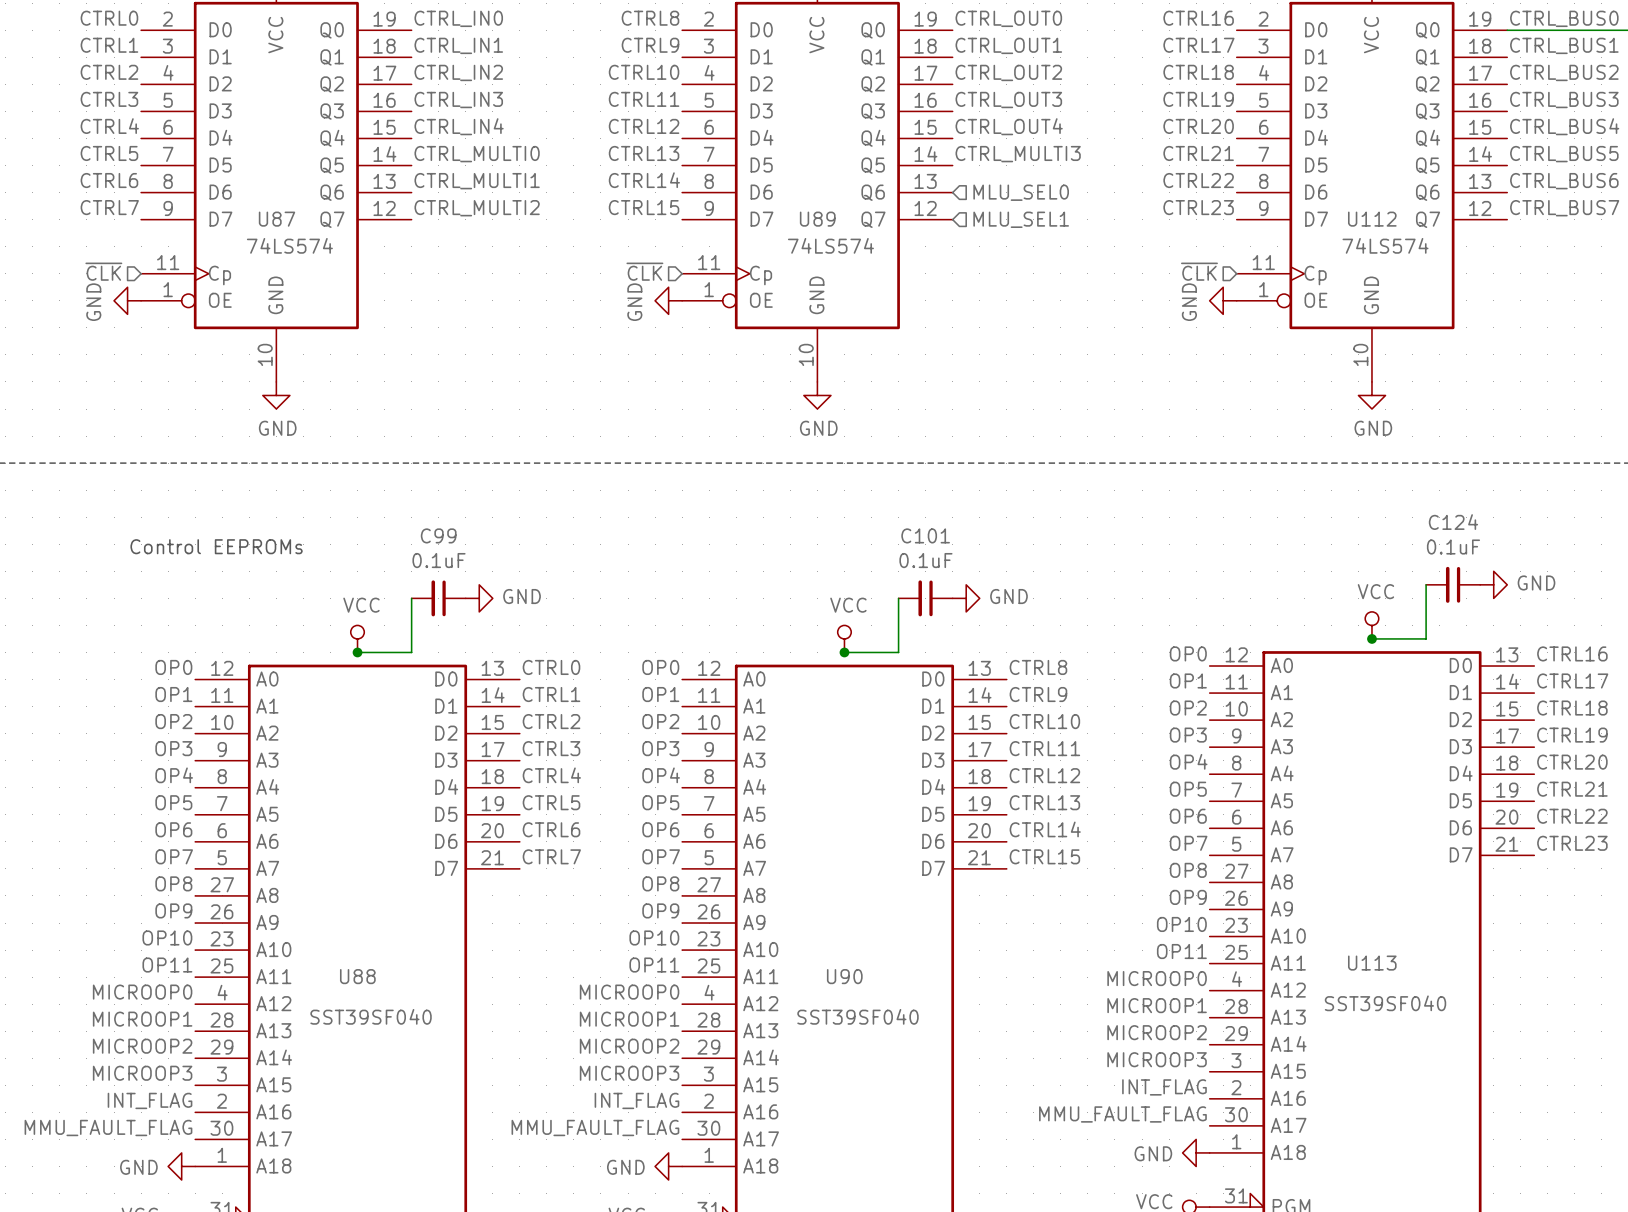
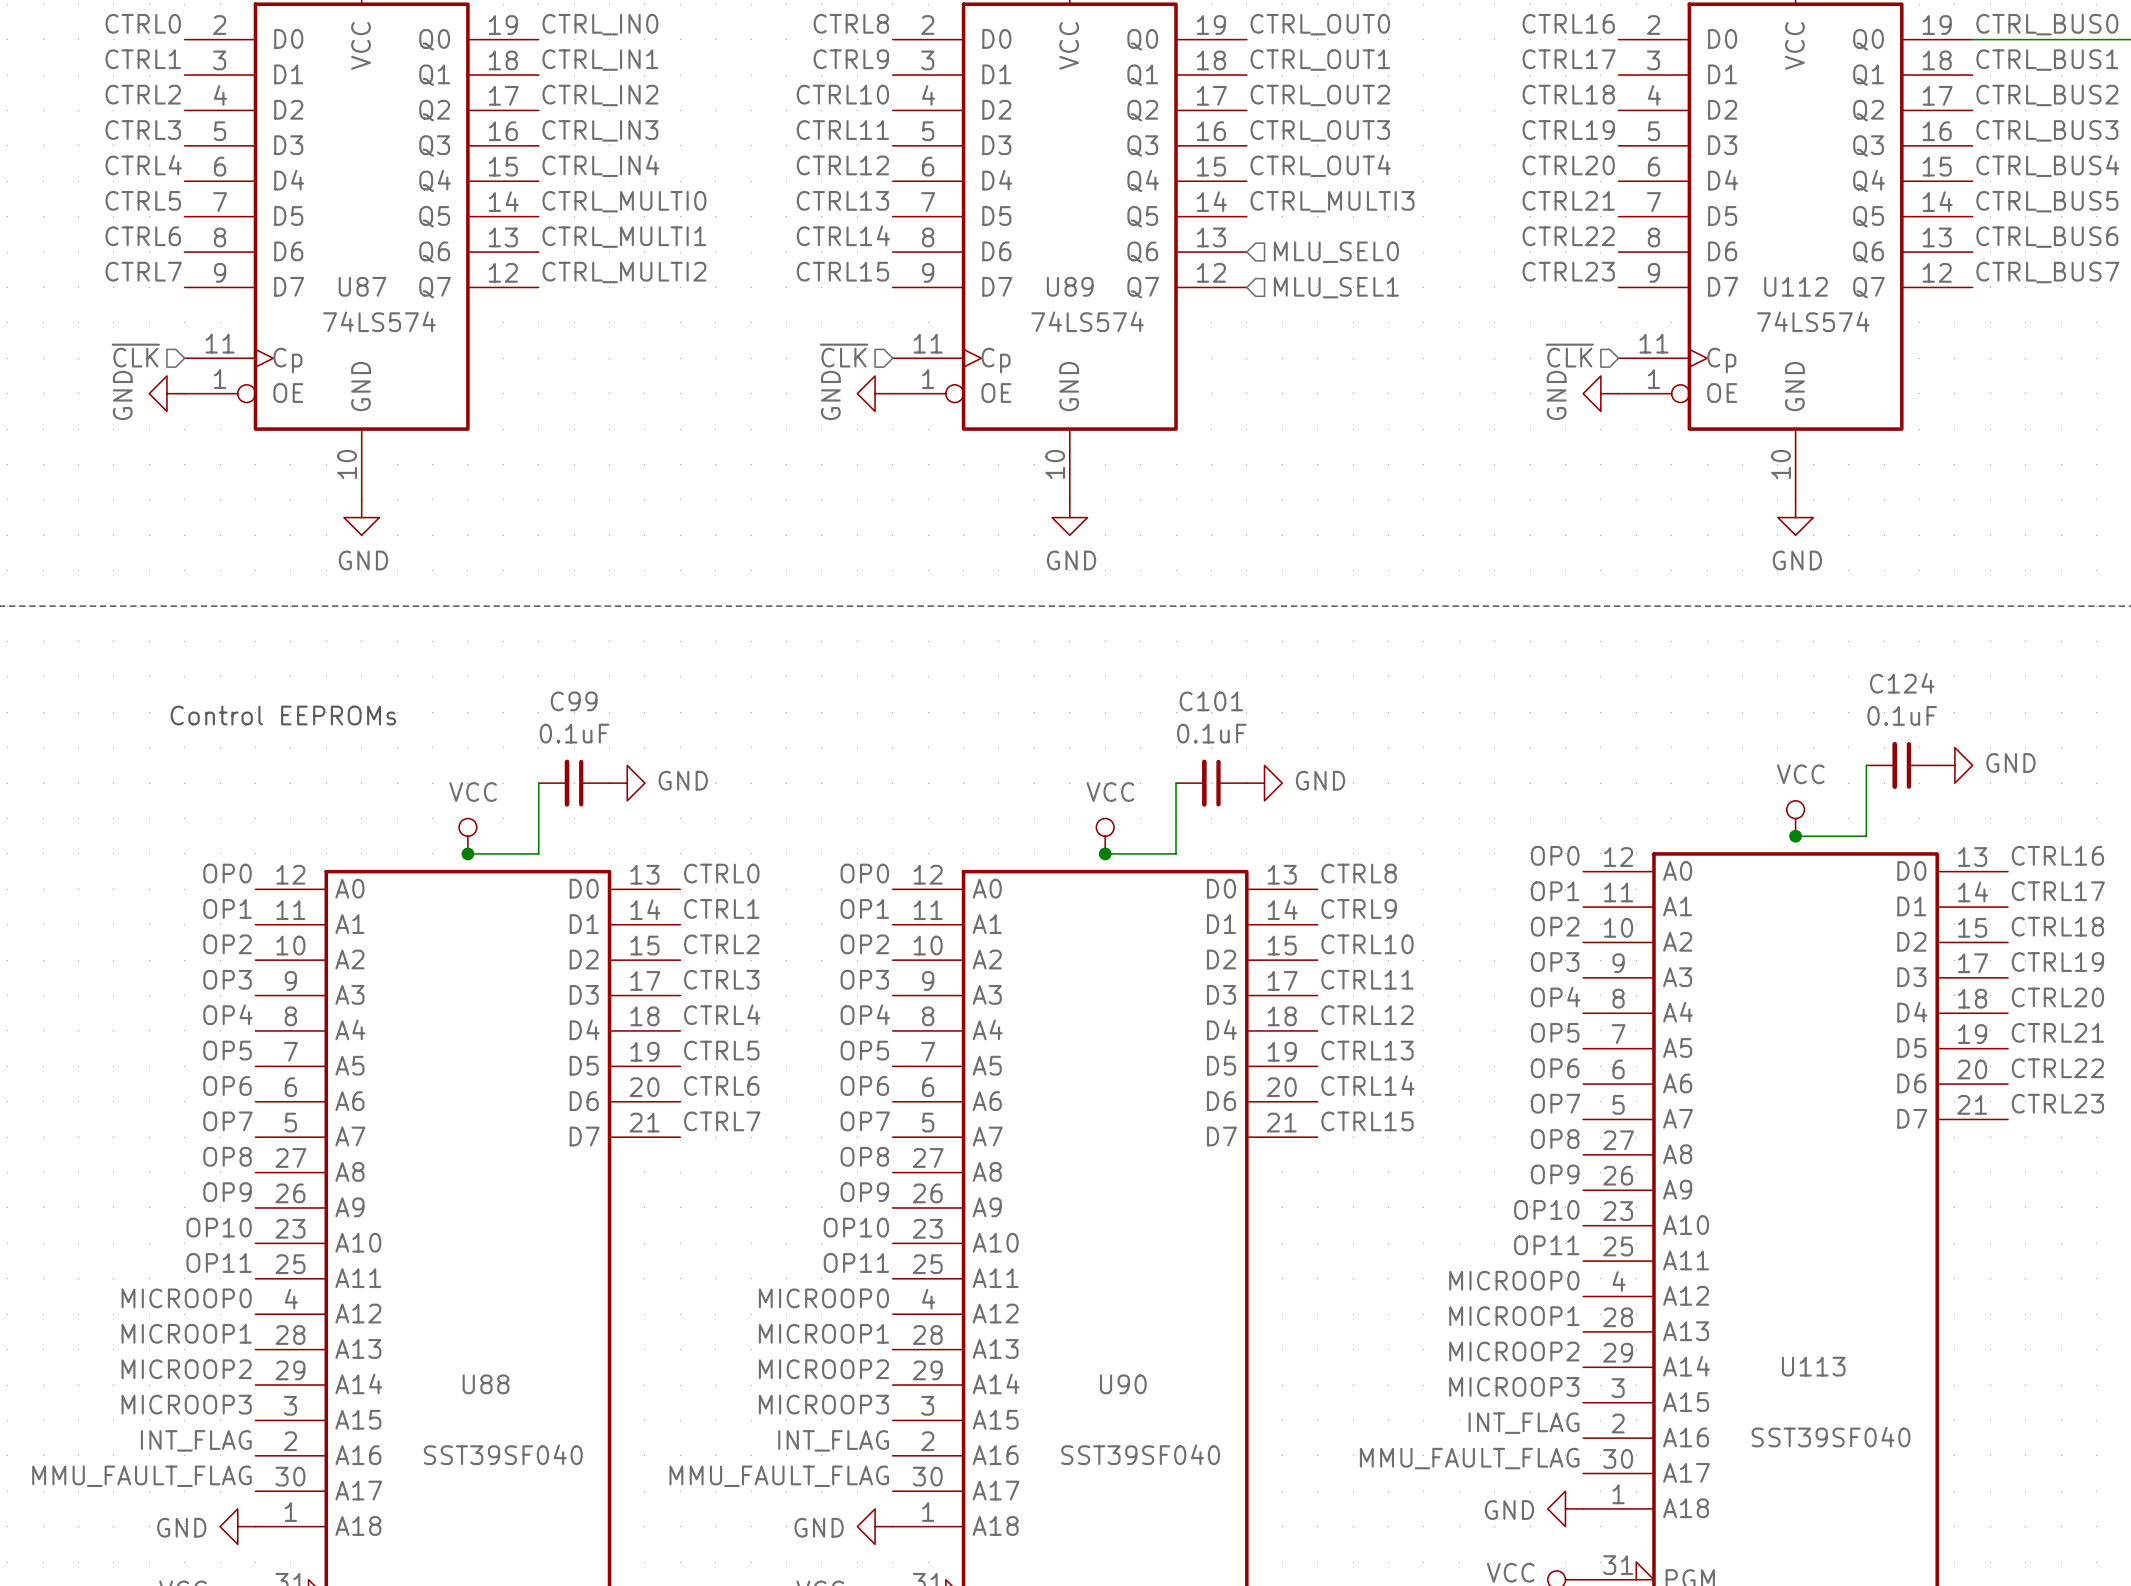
U113 name position: U113 (1372, 963) -> U113 (1813, 1366)
U88 name position: U88 (357, 976) -> U88 (486, 1384)
U90 name position: U90 (844, 976) -> U90 (1123, 1384)
U113 value position: SST39SF040 (1385, 1003) -> SST39SF040 (1831, 1437)
U88 value position: SST39SF040 (371, 1016) -> SST39SF040 (503, 1454)
U90 value position: SST39SF040 (857, 1016) -> SST39SF040 (1140, 1454)

